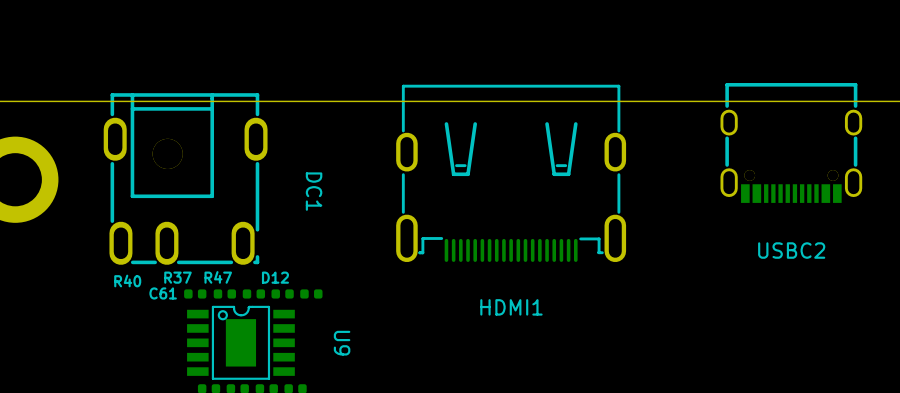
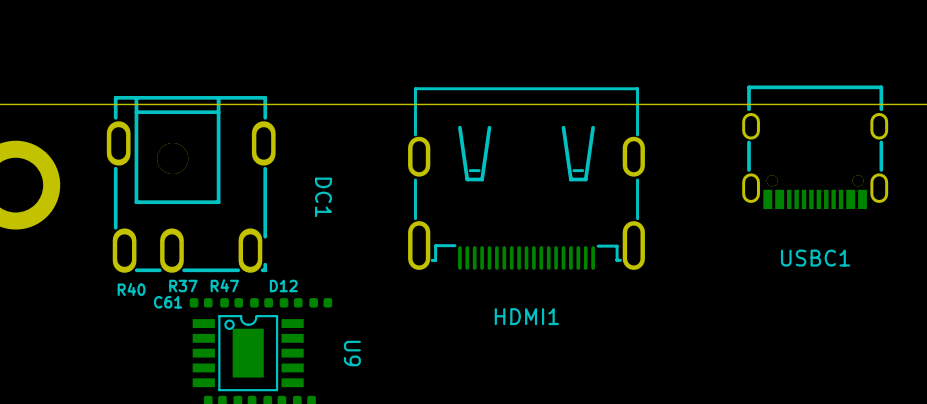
USBC2 name: USBC2 (791, 250) -> USBC1 (815, 258)

